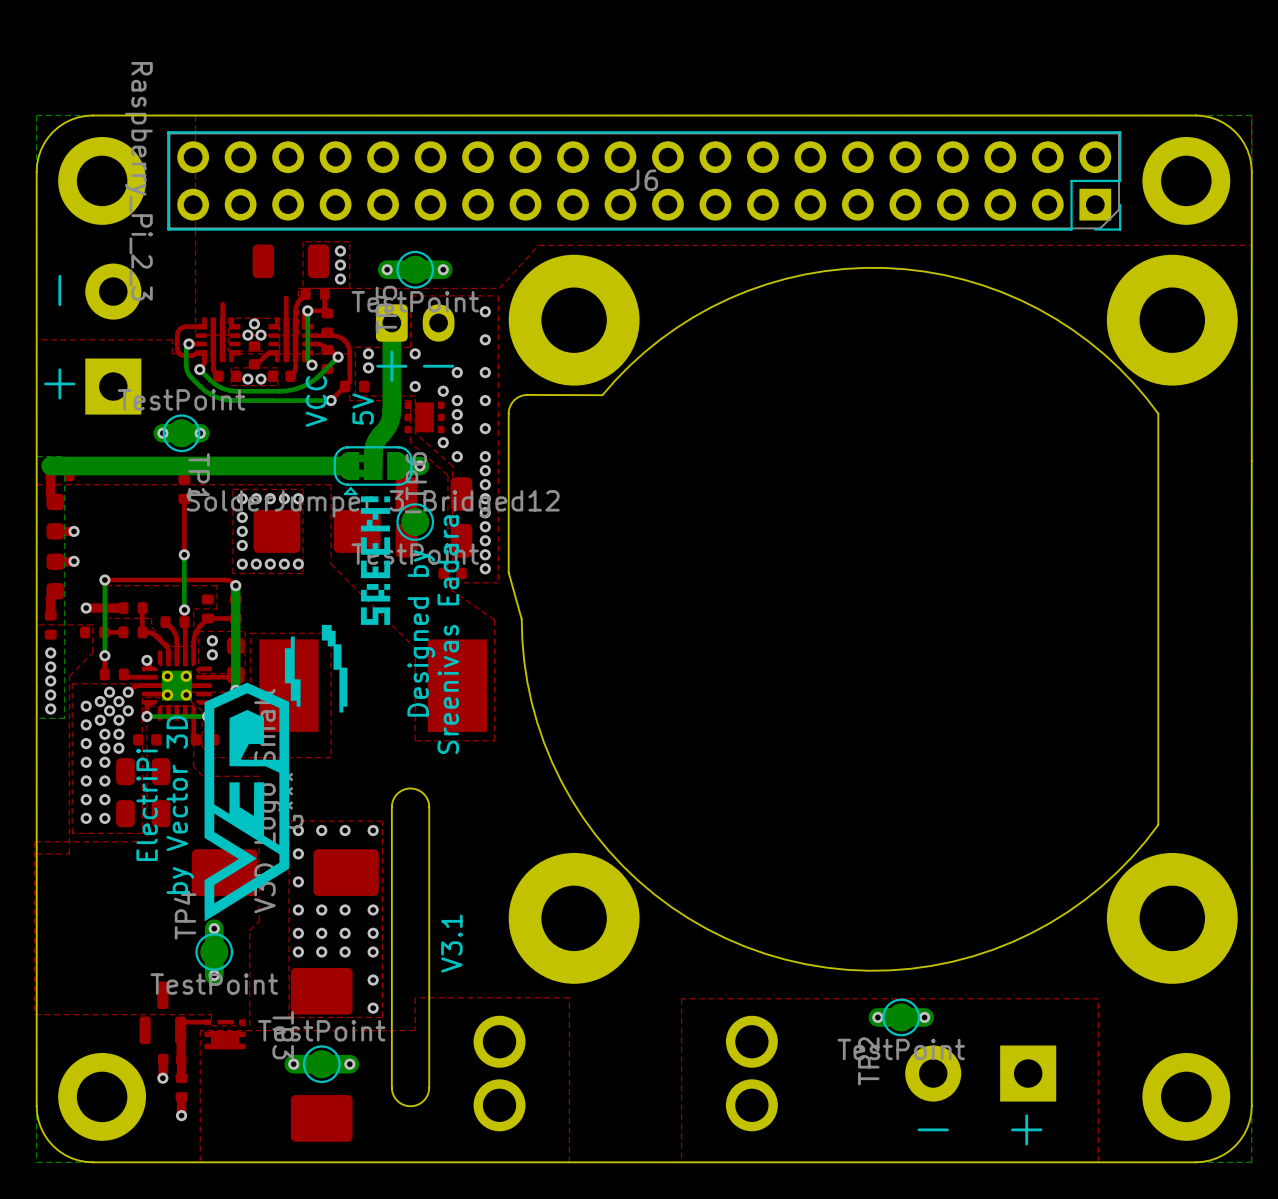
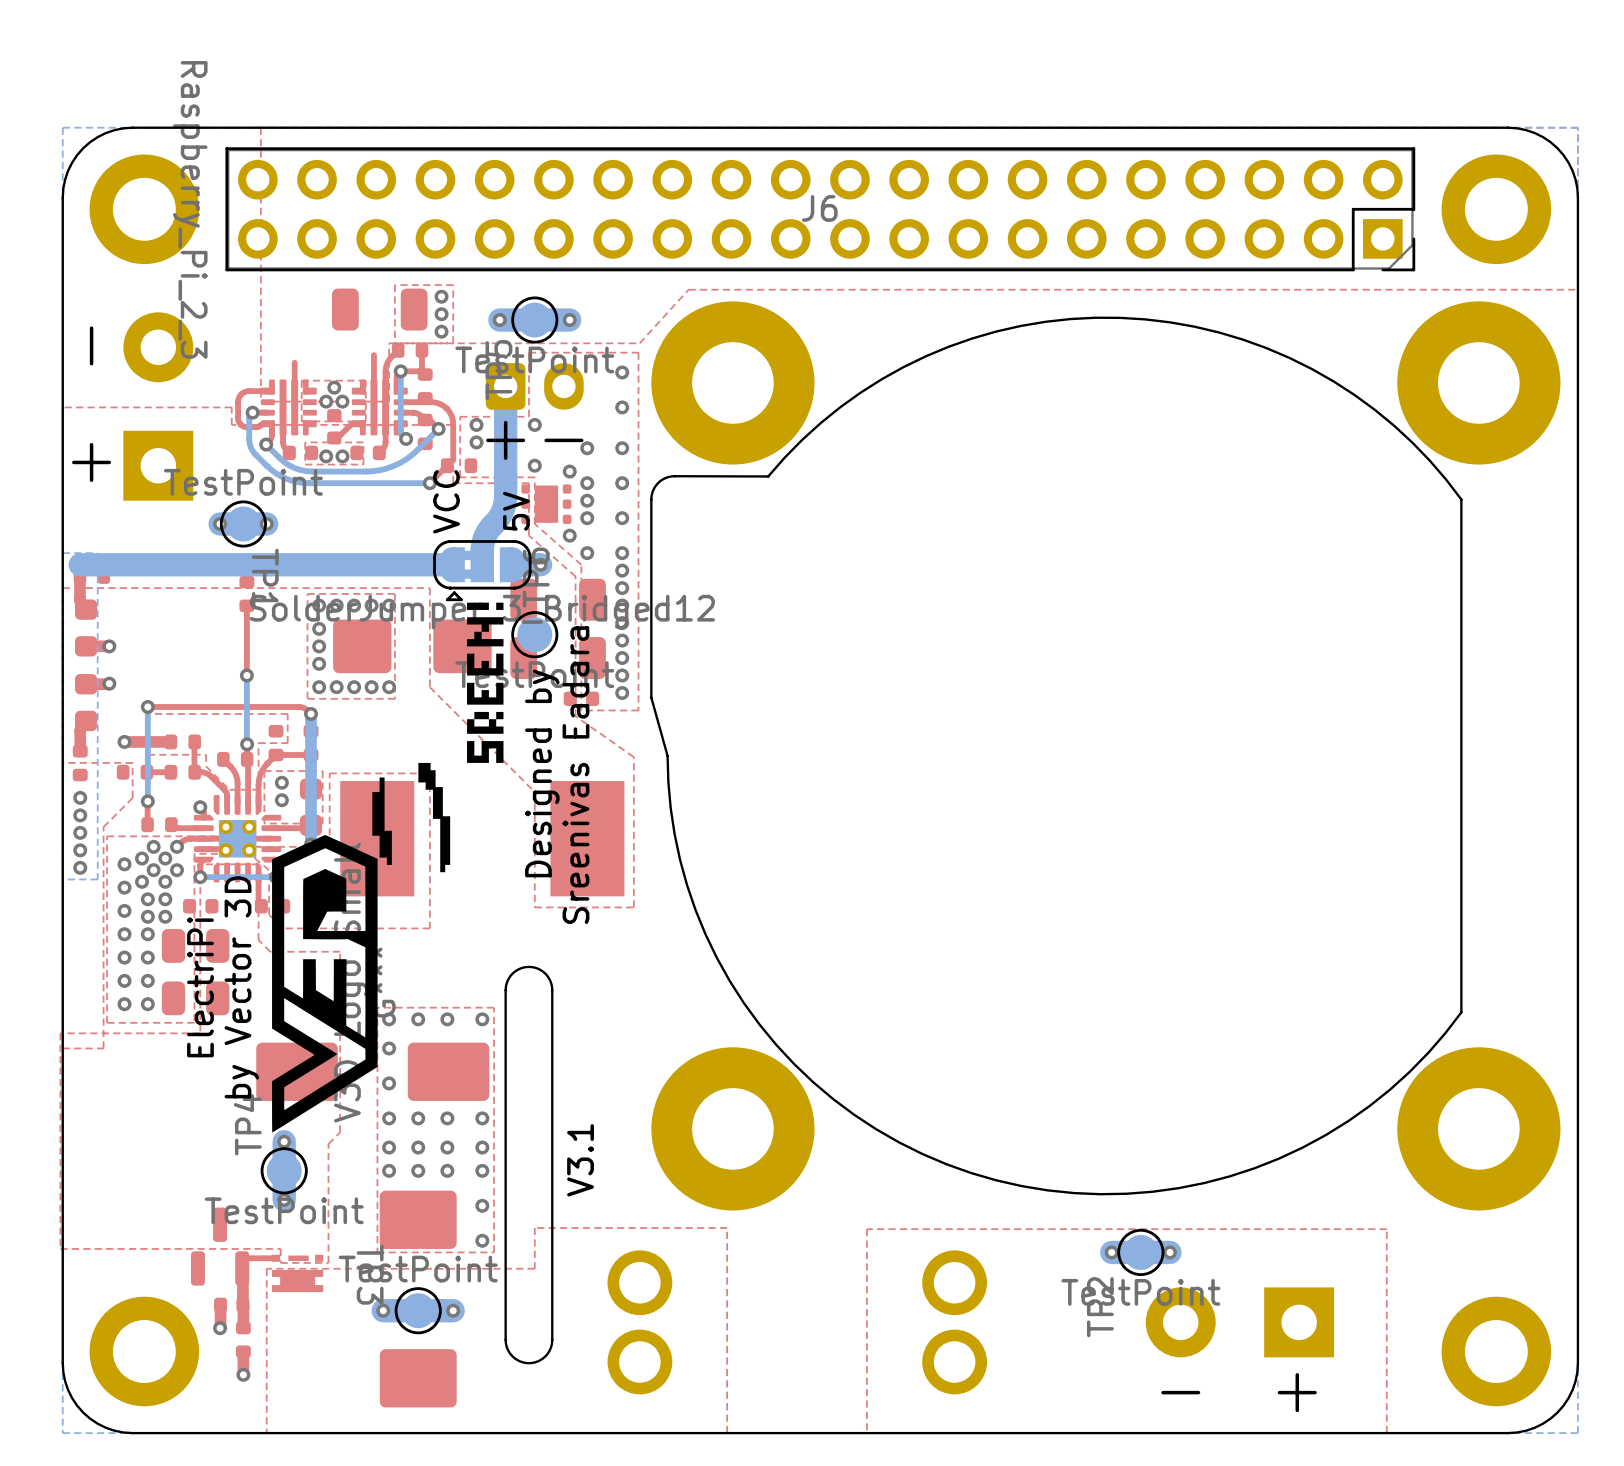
text position: VCC (316, 401) -> VCC (446, 501)
text position: 5V (363, 409) -> 5V (516, 511)

